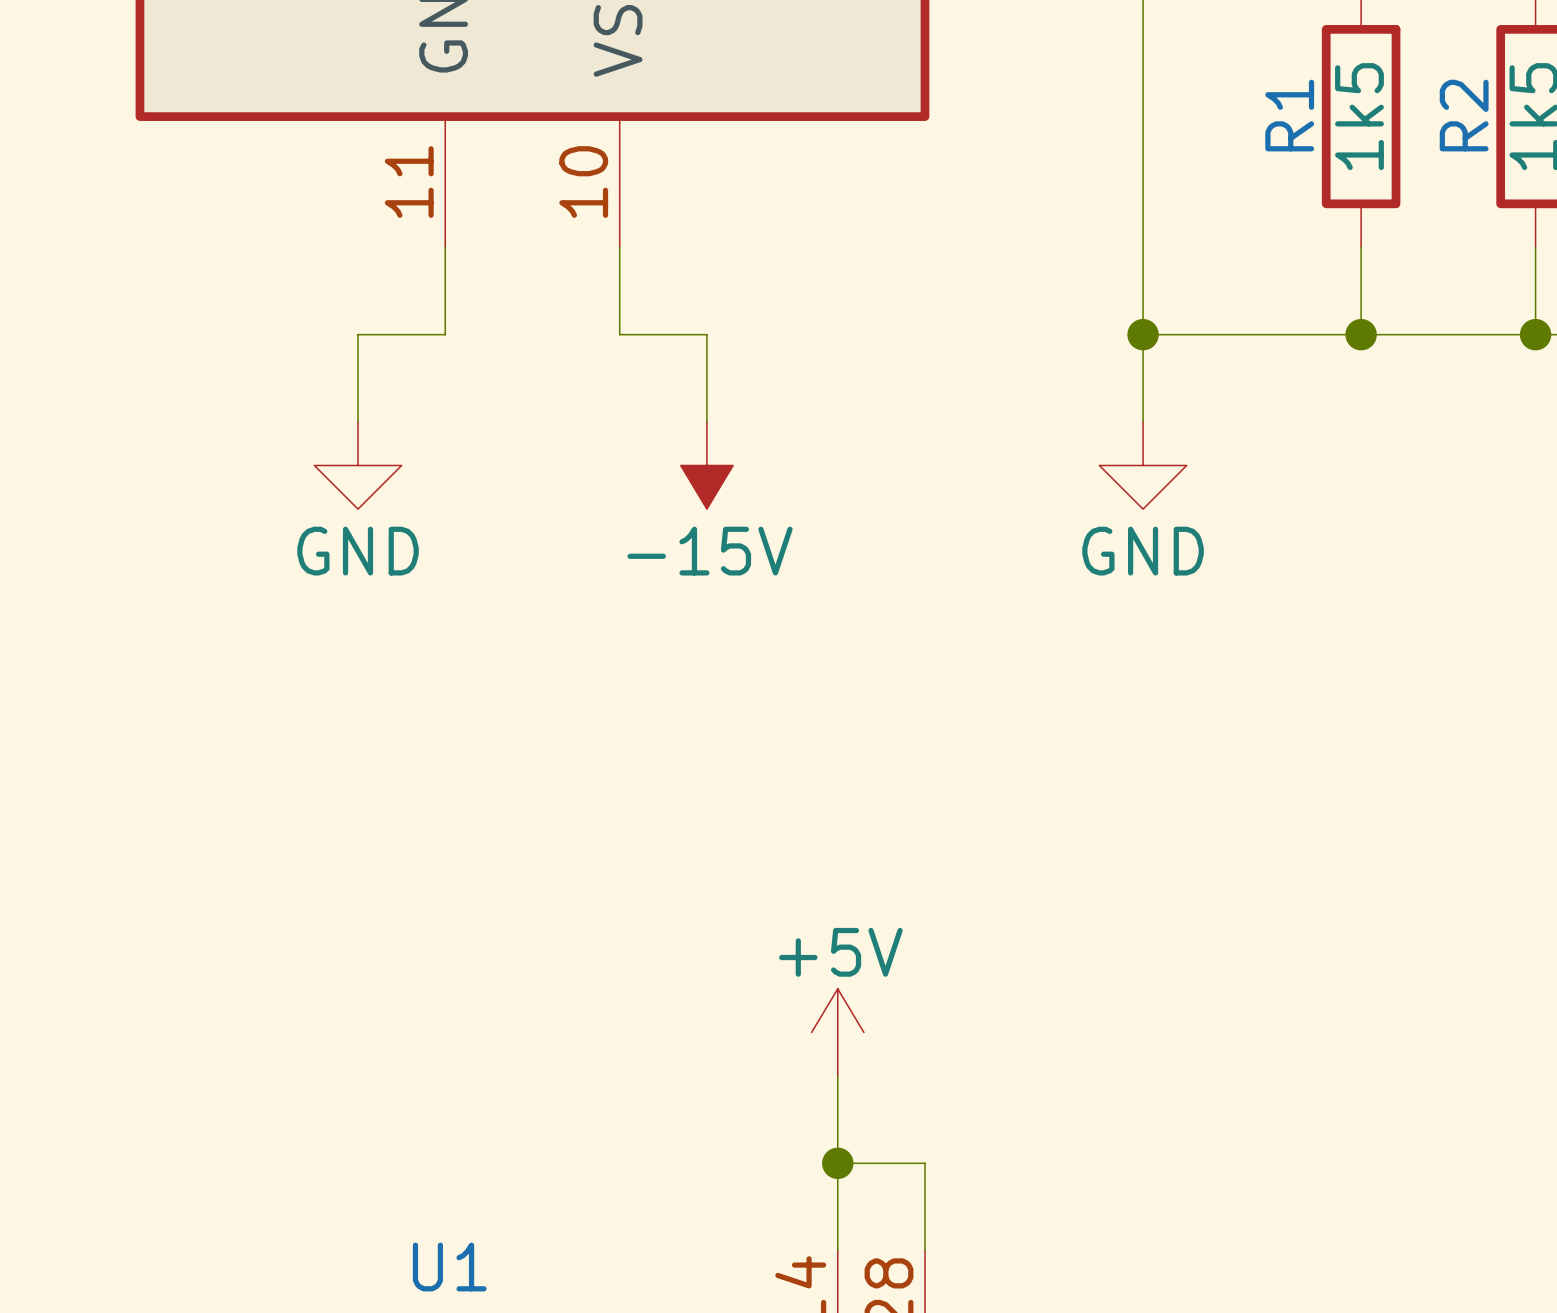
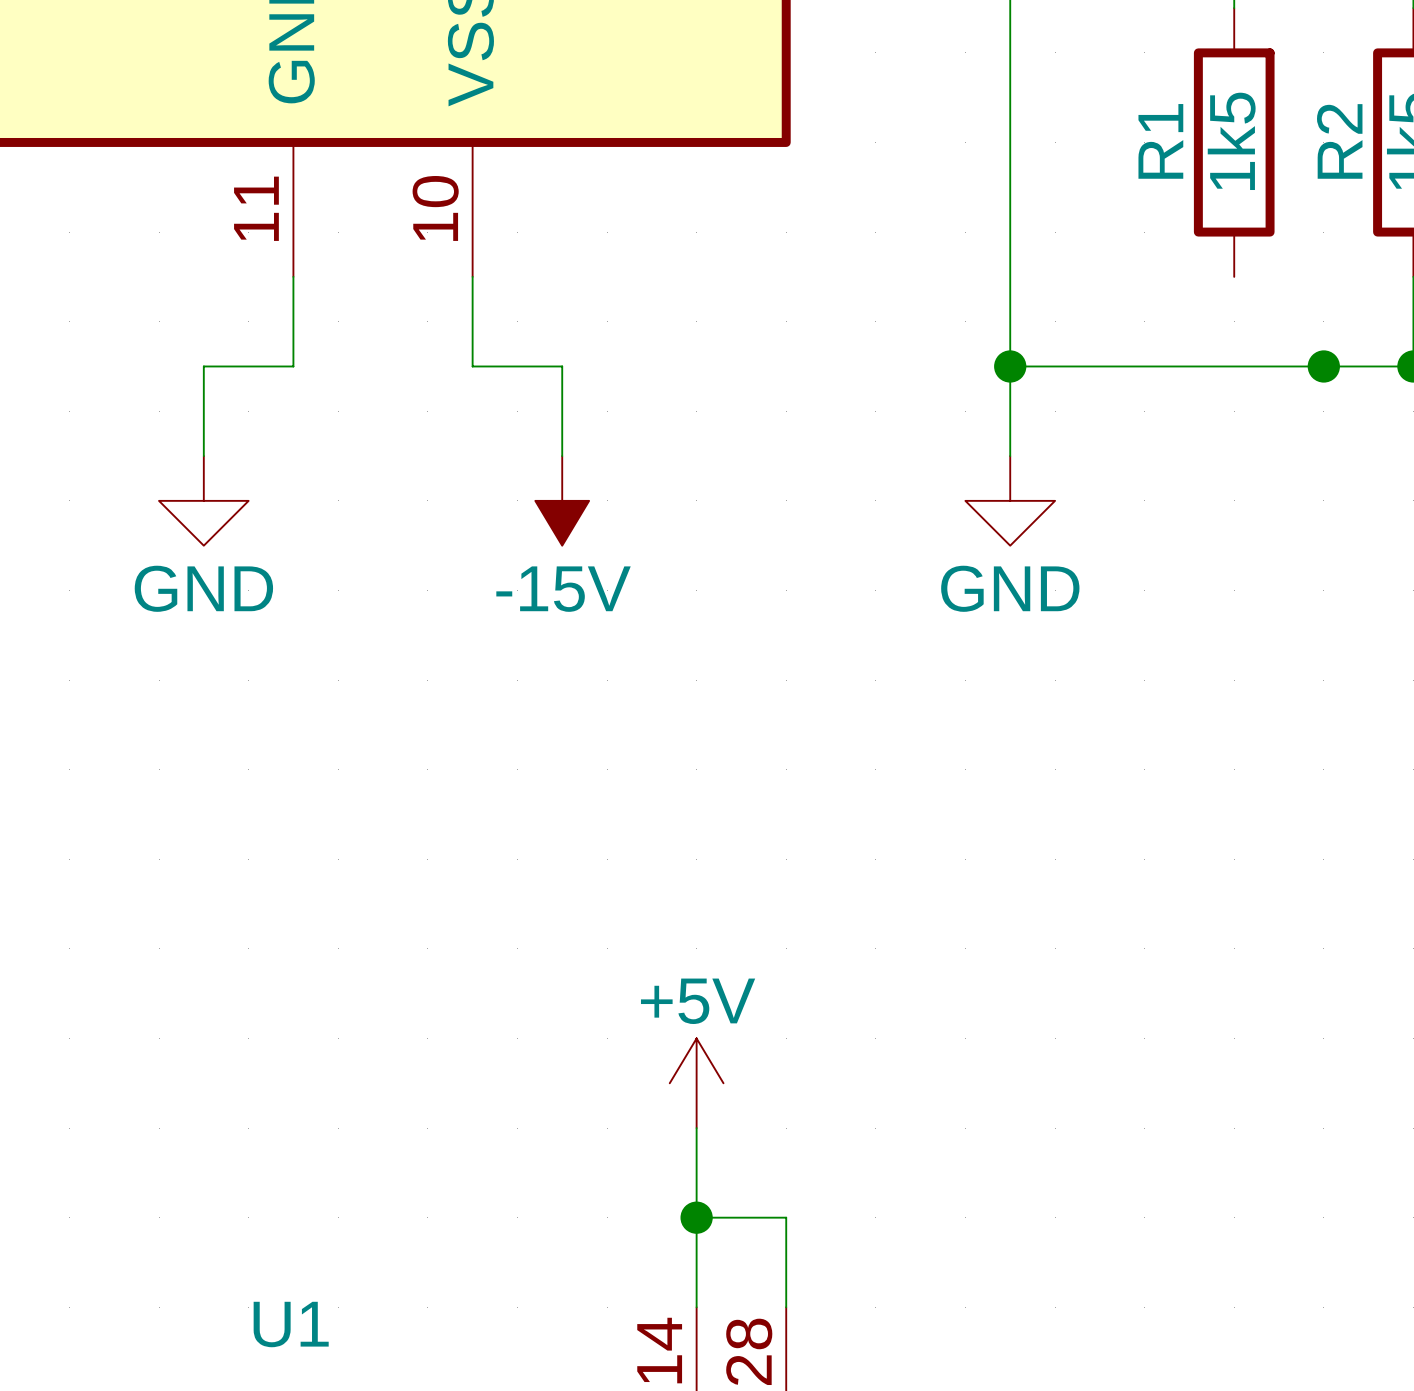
wire: (1361, 247) (1361, 334) -> none
junction position: (1361, 334) -> (1323, 366)

